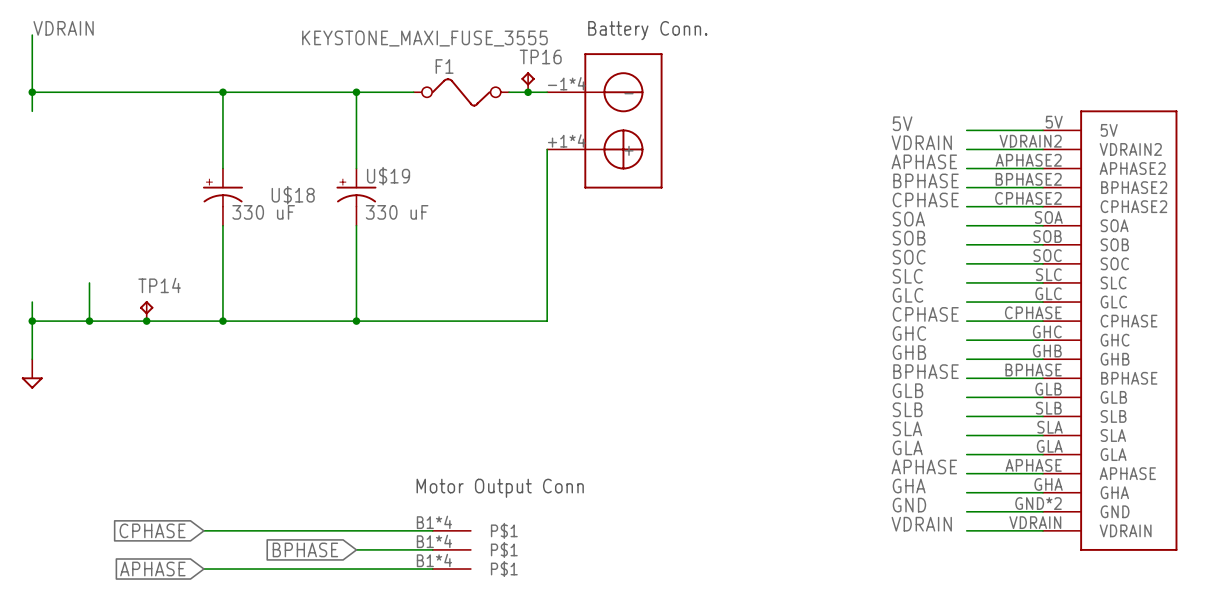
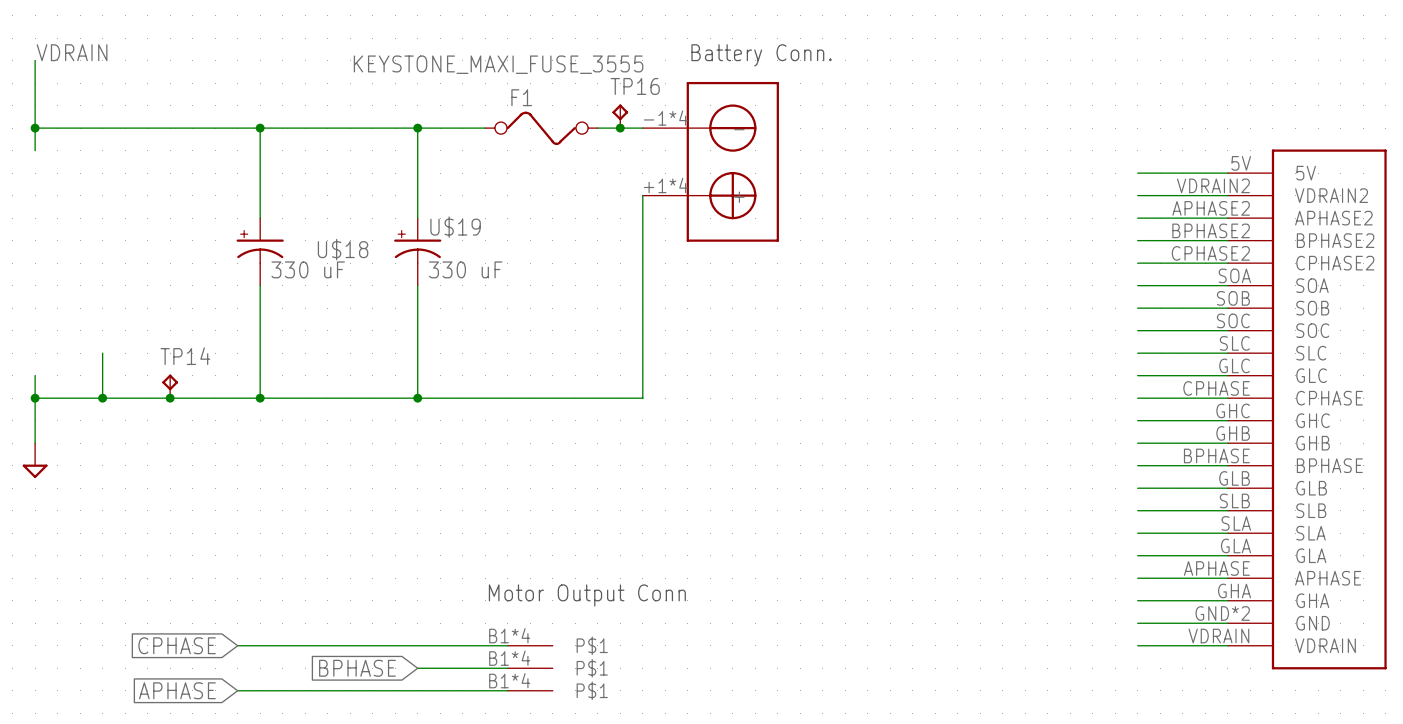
label: 5V (902, 123) -> none
label: VDRAIN (921, 142) -> none
label: APHASE (924, 161) -> none
label: BPHASE (926, 180) -> none
label: CPHASE (925, 200) -> none
label: SOA (908, 219) -> none
label: SOB (909, 238) -> none
label: SOC (909, 257) -> none
label: SLC (907, 276) -> none
label: GLC (908, 295) -> none
label: CPHASE (925, 314) -> none
label: GHC (909, 333) -> none
label: GHB (909, 352) -> none
label: BPHASE (926, 371) -> none
label: GLB (908, 390) -> none
label: SLB (907, 409) -> none
label: SLA (907, 428) -> none
label: GLA (907, 447) -> none
label: APHASE (924, 466) -> none
label: GHA (909, 486) -> none
label: GND (909, 505) -> none
label: VDRAIN (921, 524) -> none

